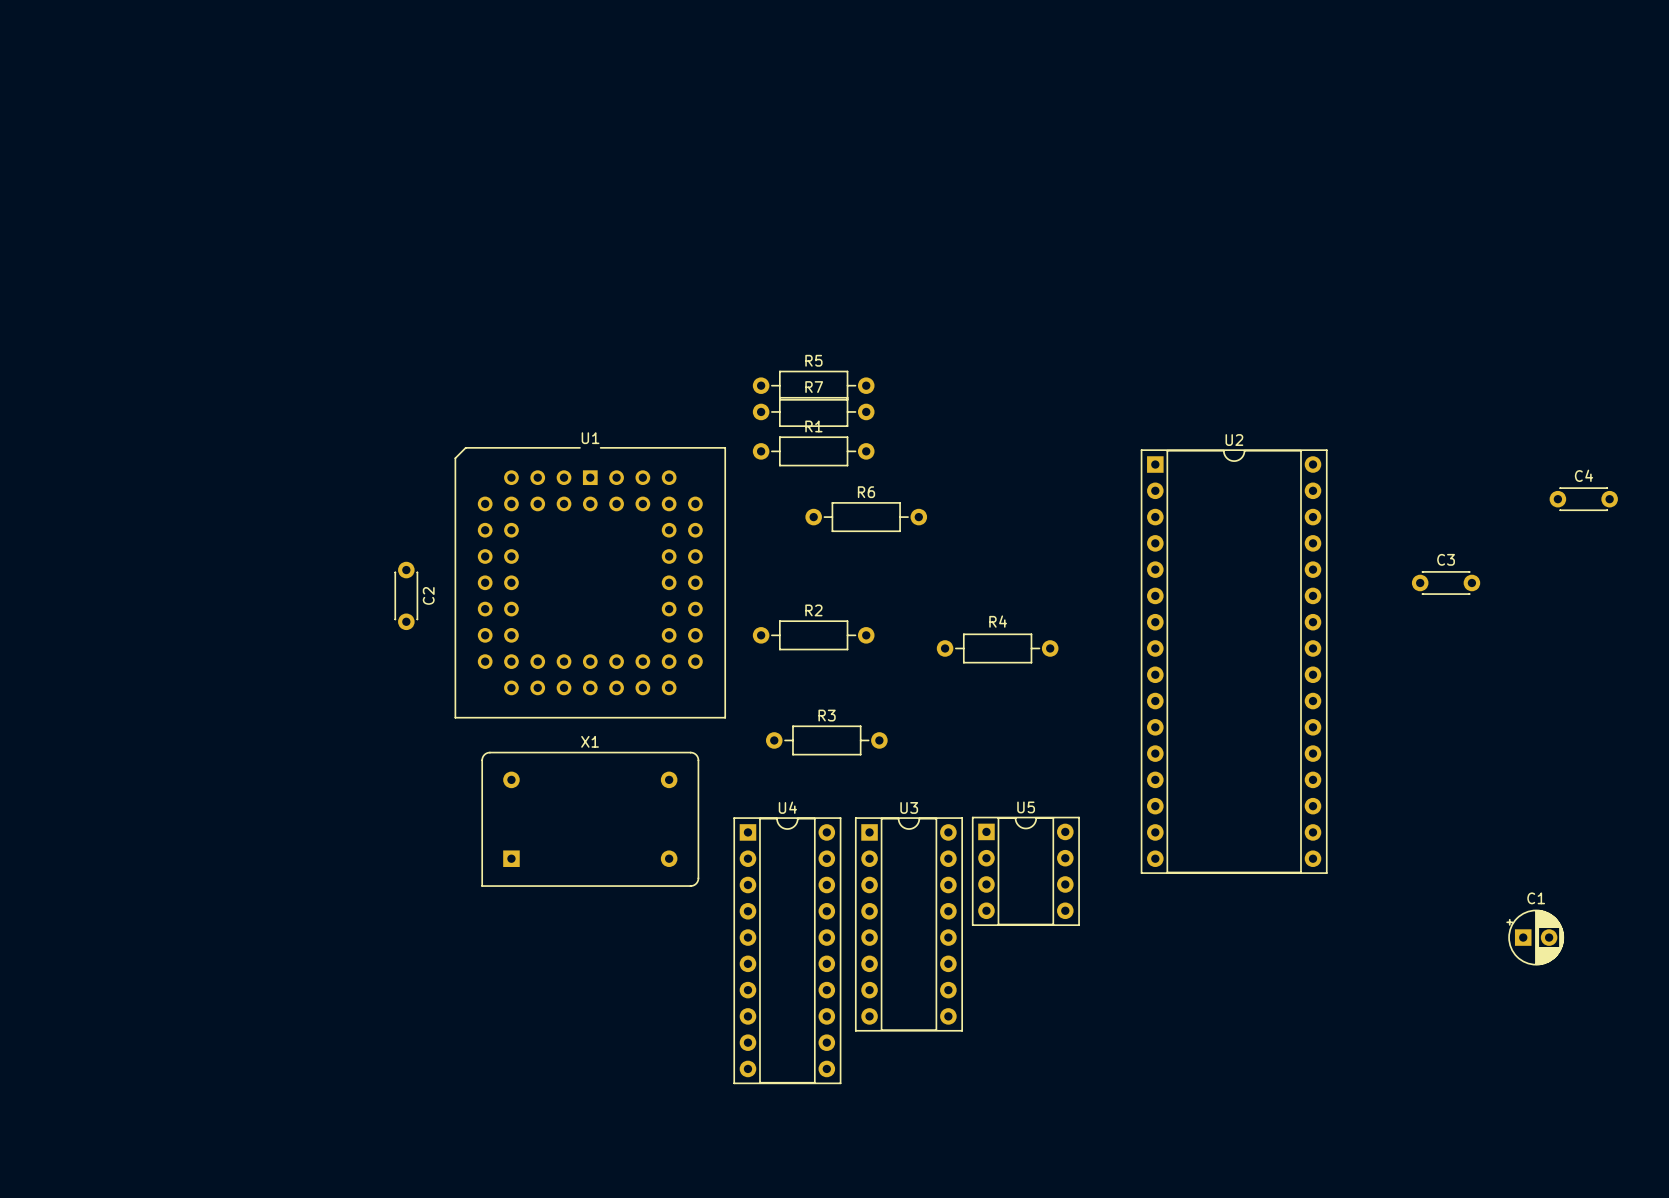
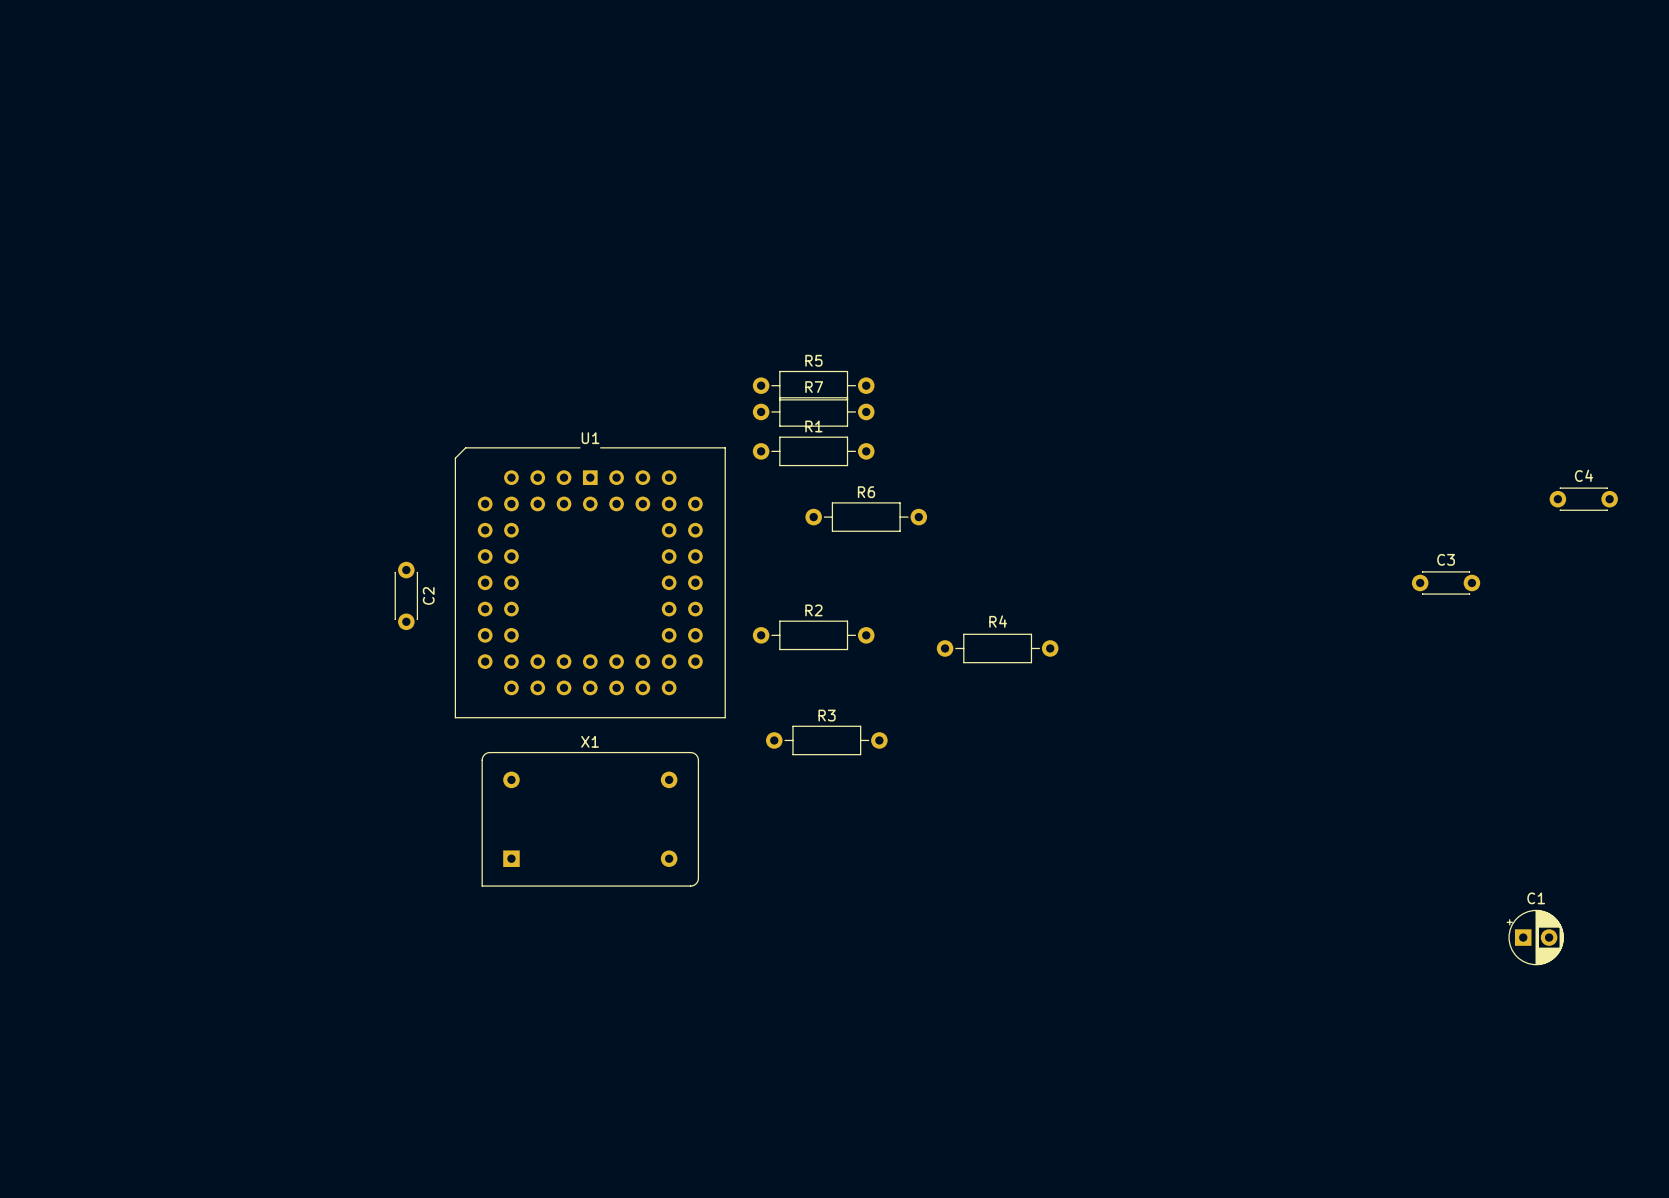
U2: (1234, 661) -> none
U5: (1025, 871) -> none
U3: (908, 924) -> none
U4: (787, 950) -> none

